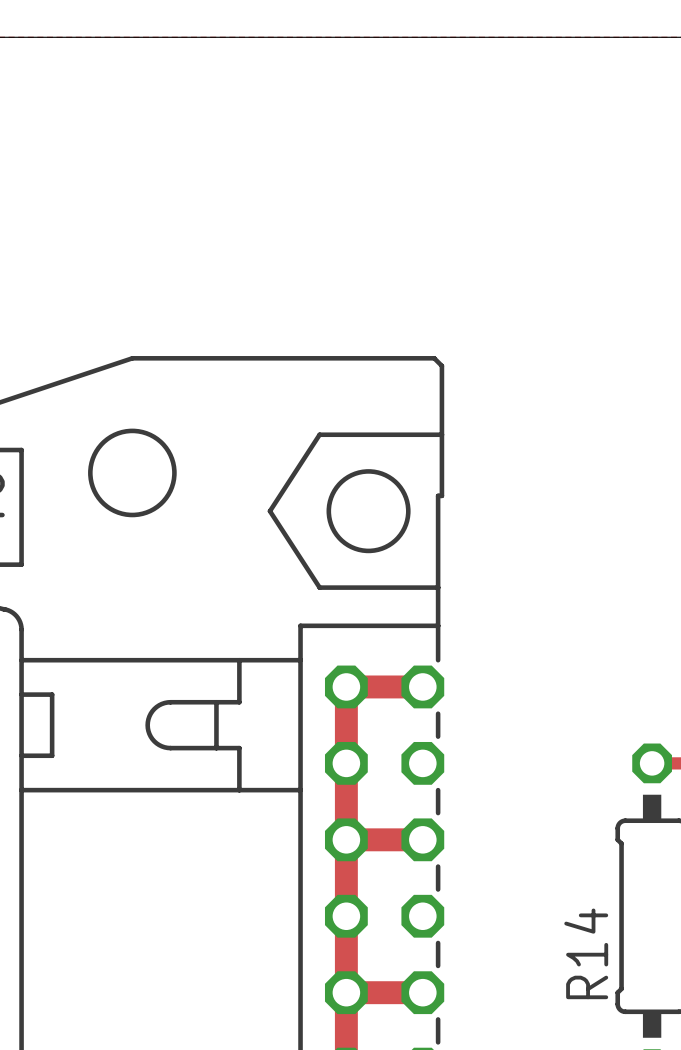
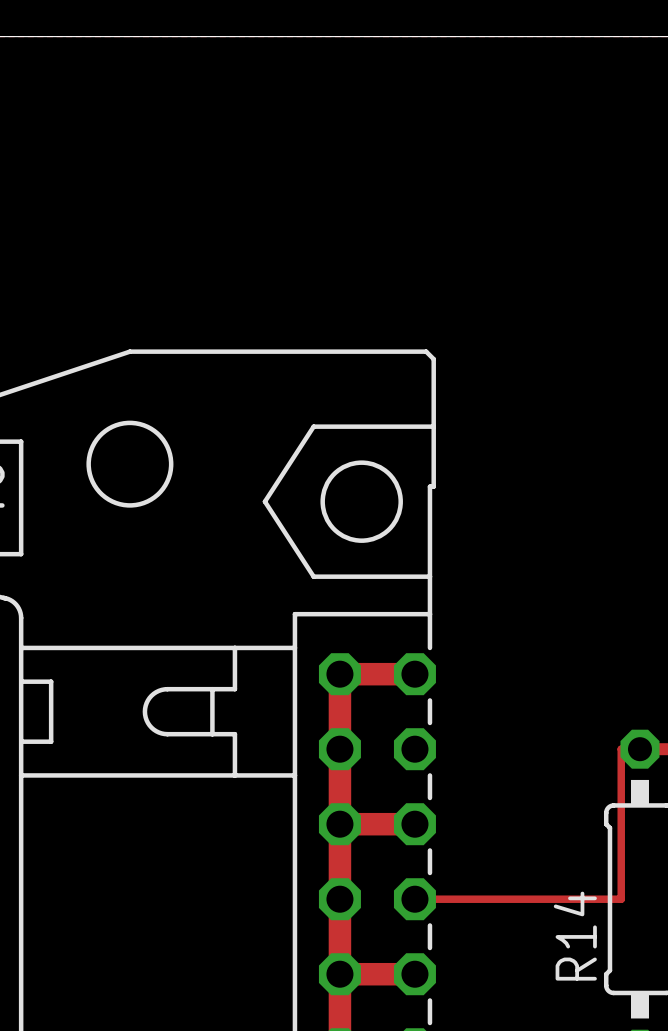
track: none -> (639, 749) (621, 749) (621, 899) (414, 899)

